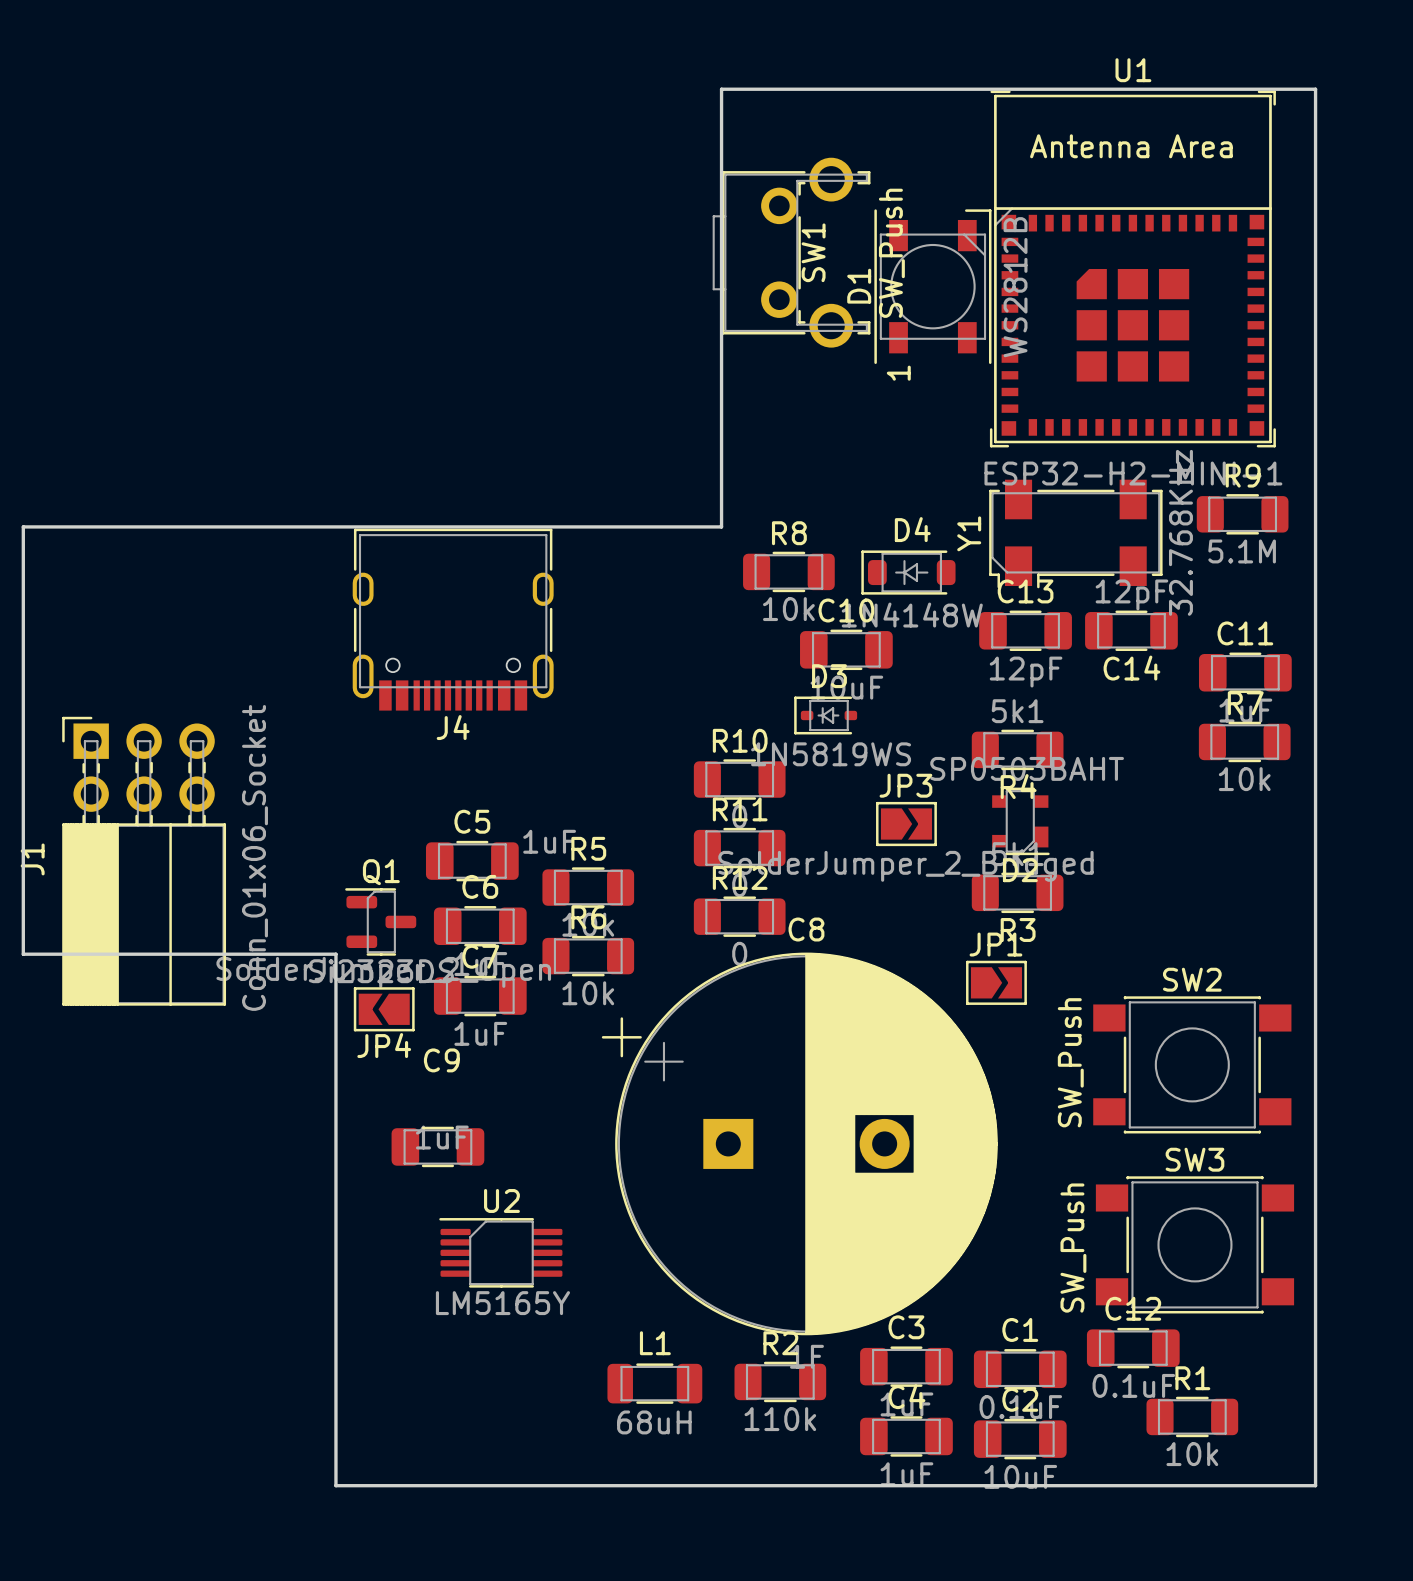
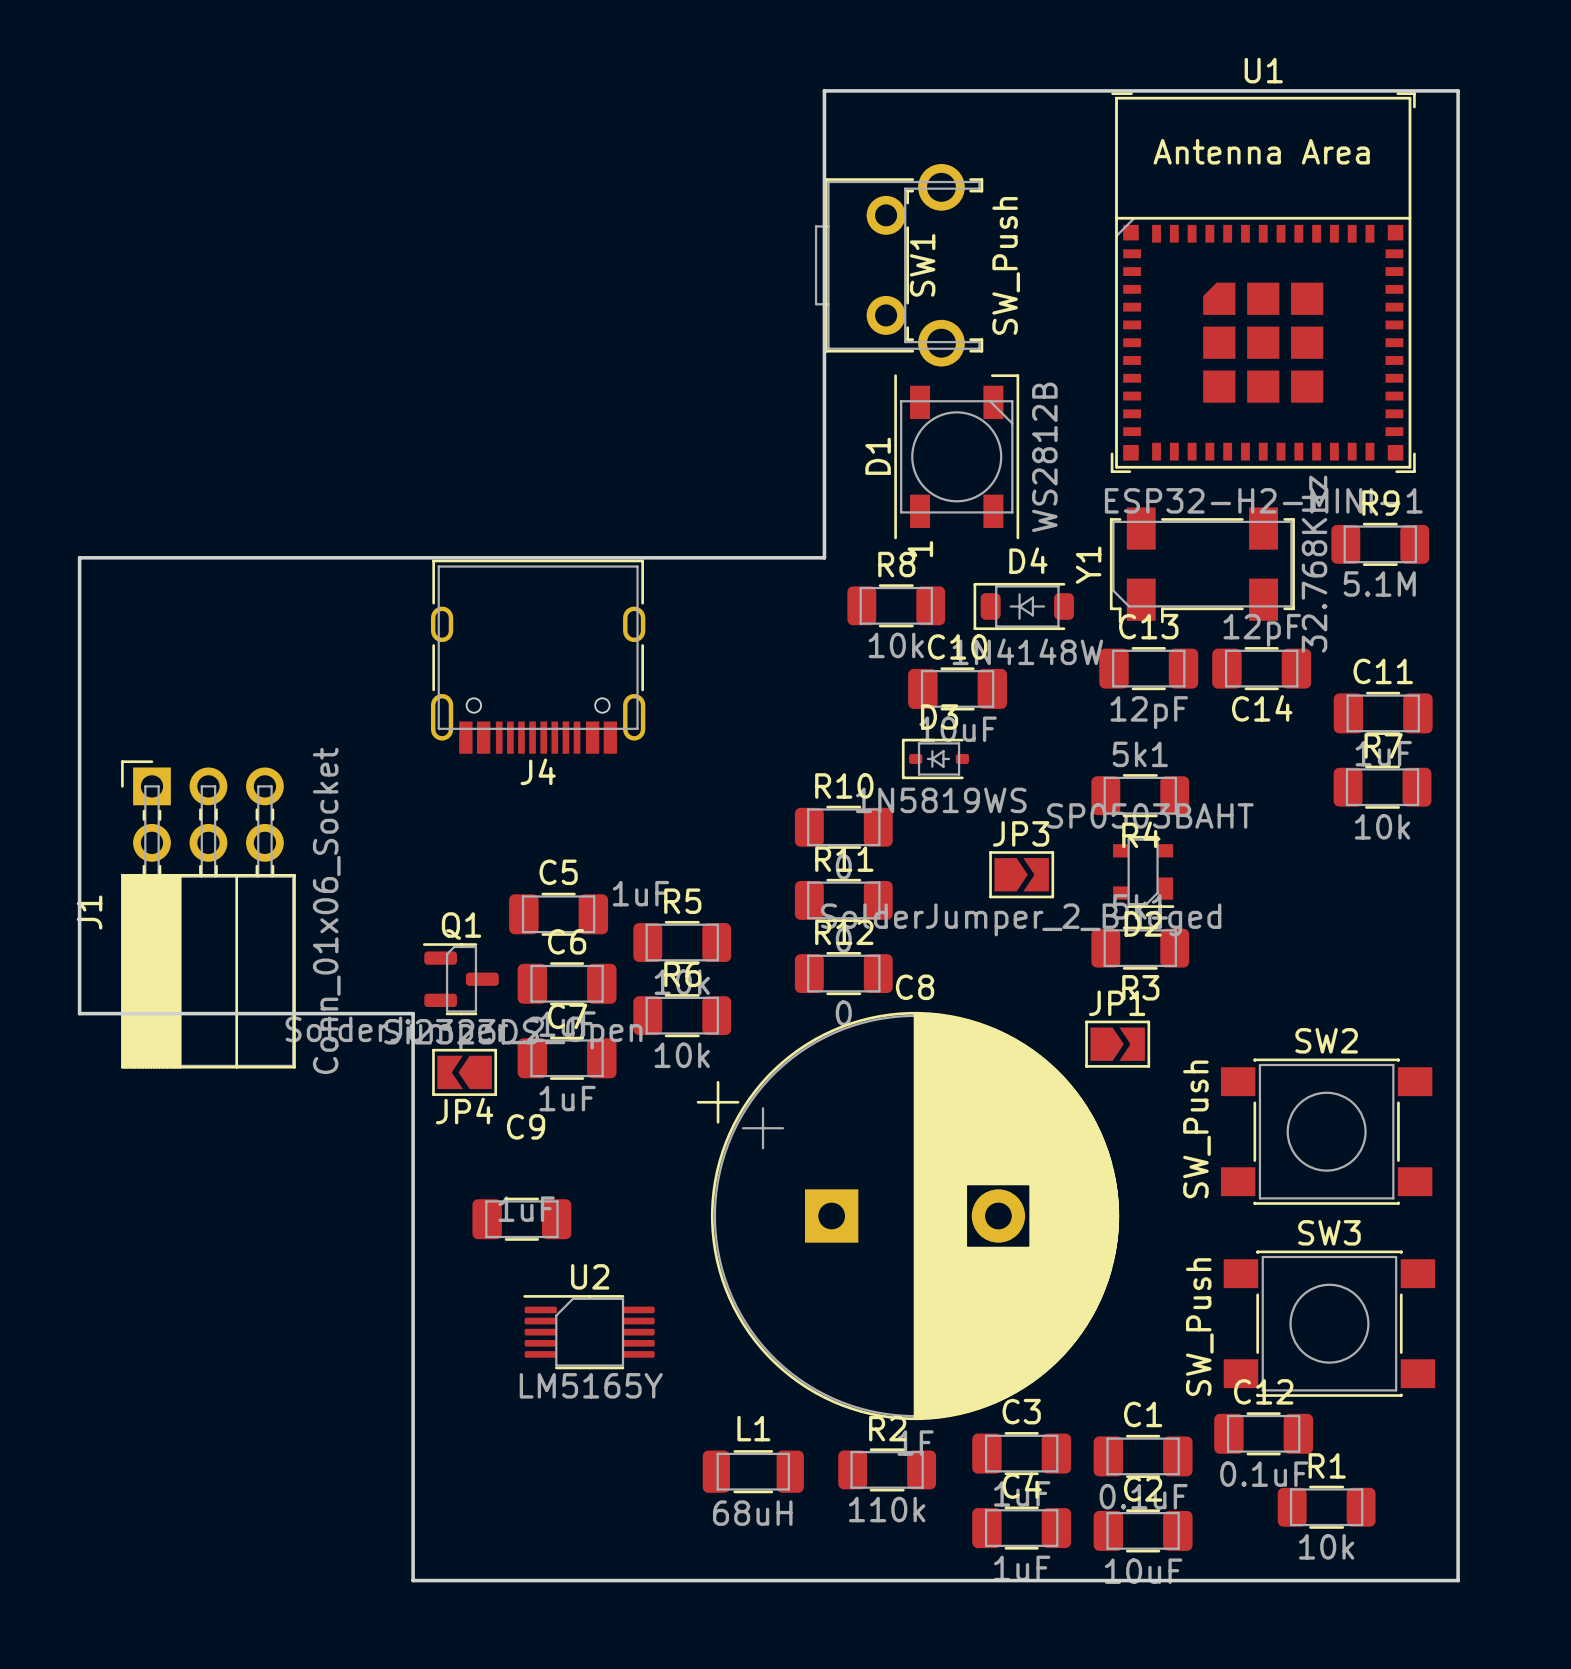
D1 position: (932, 286) -> (956, 456)

